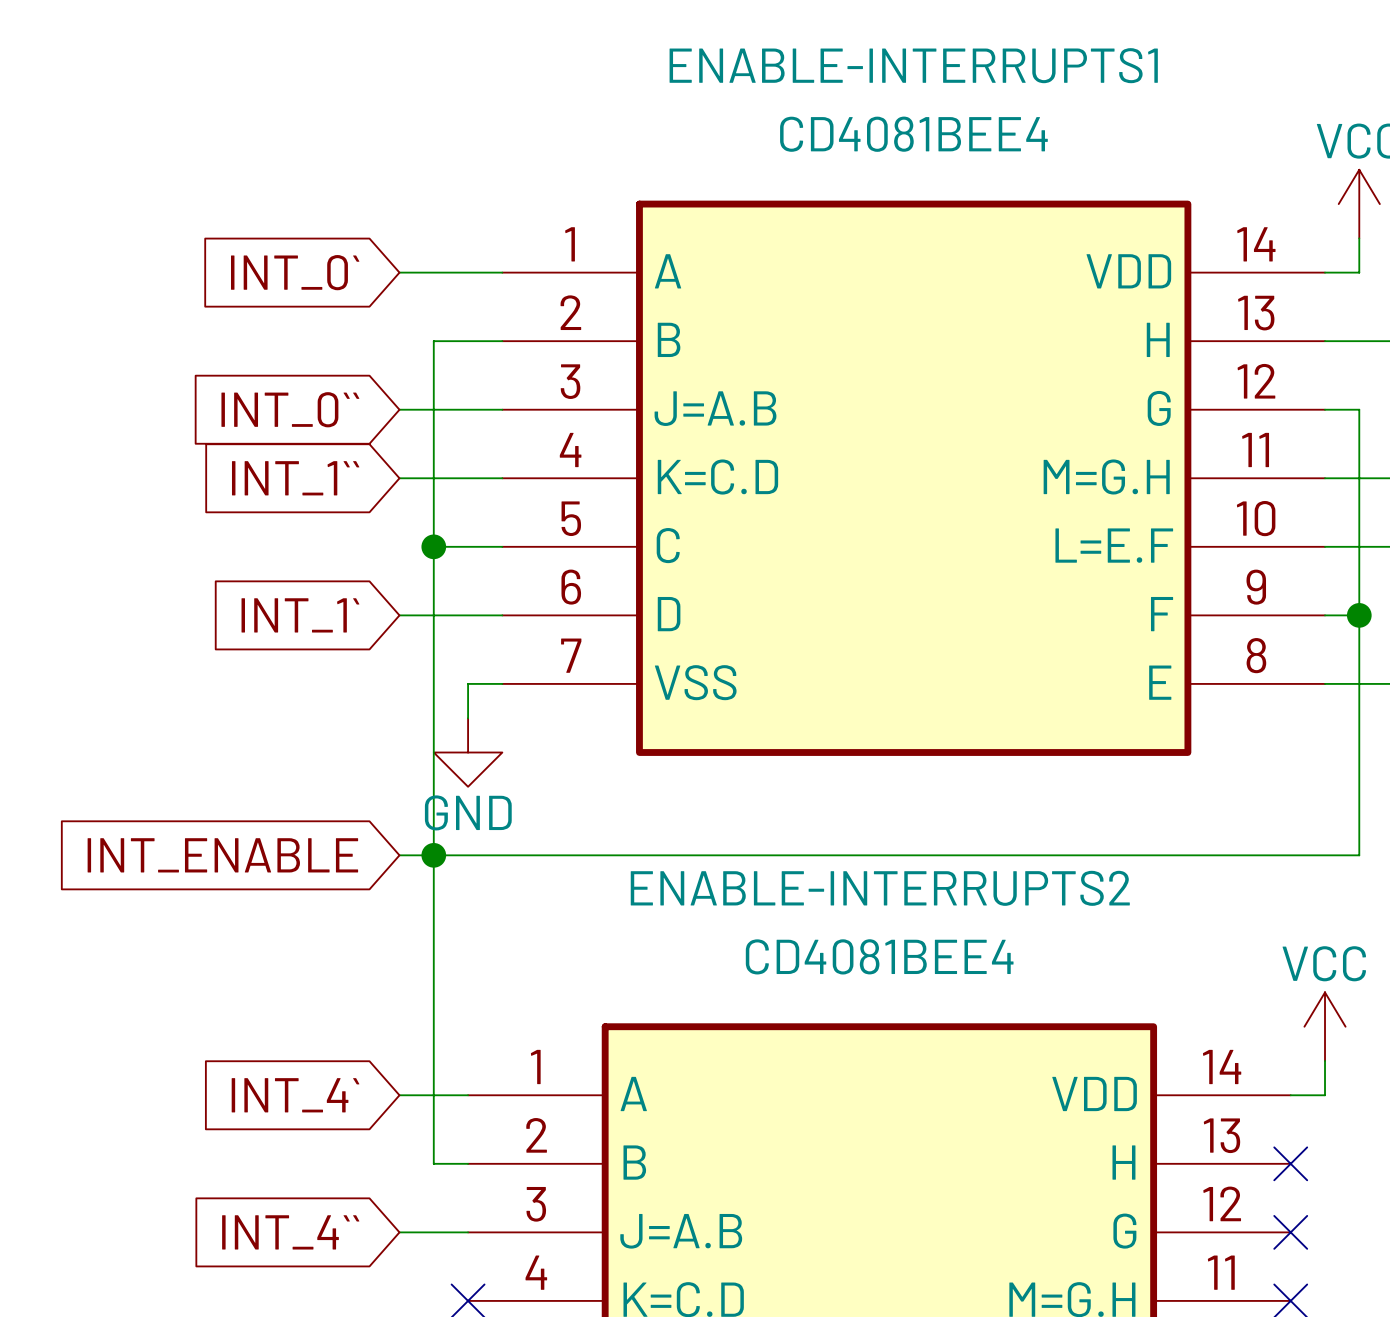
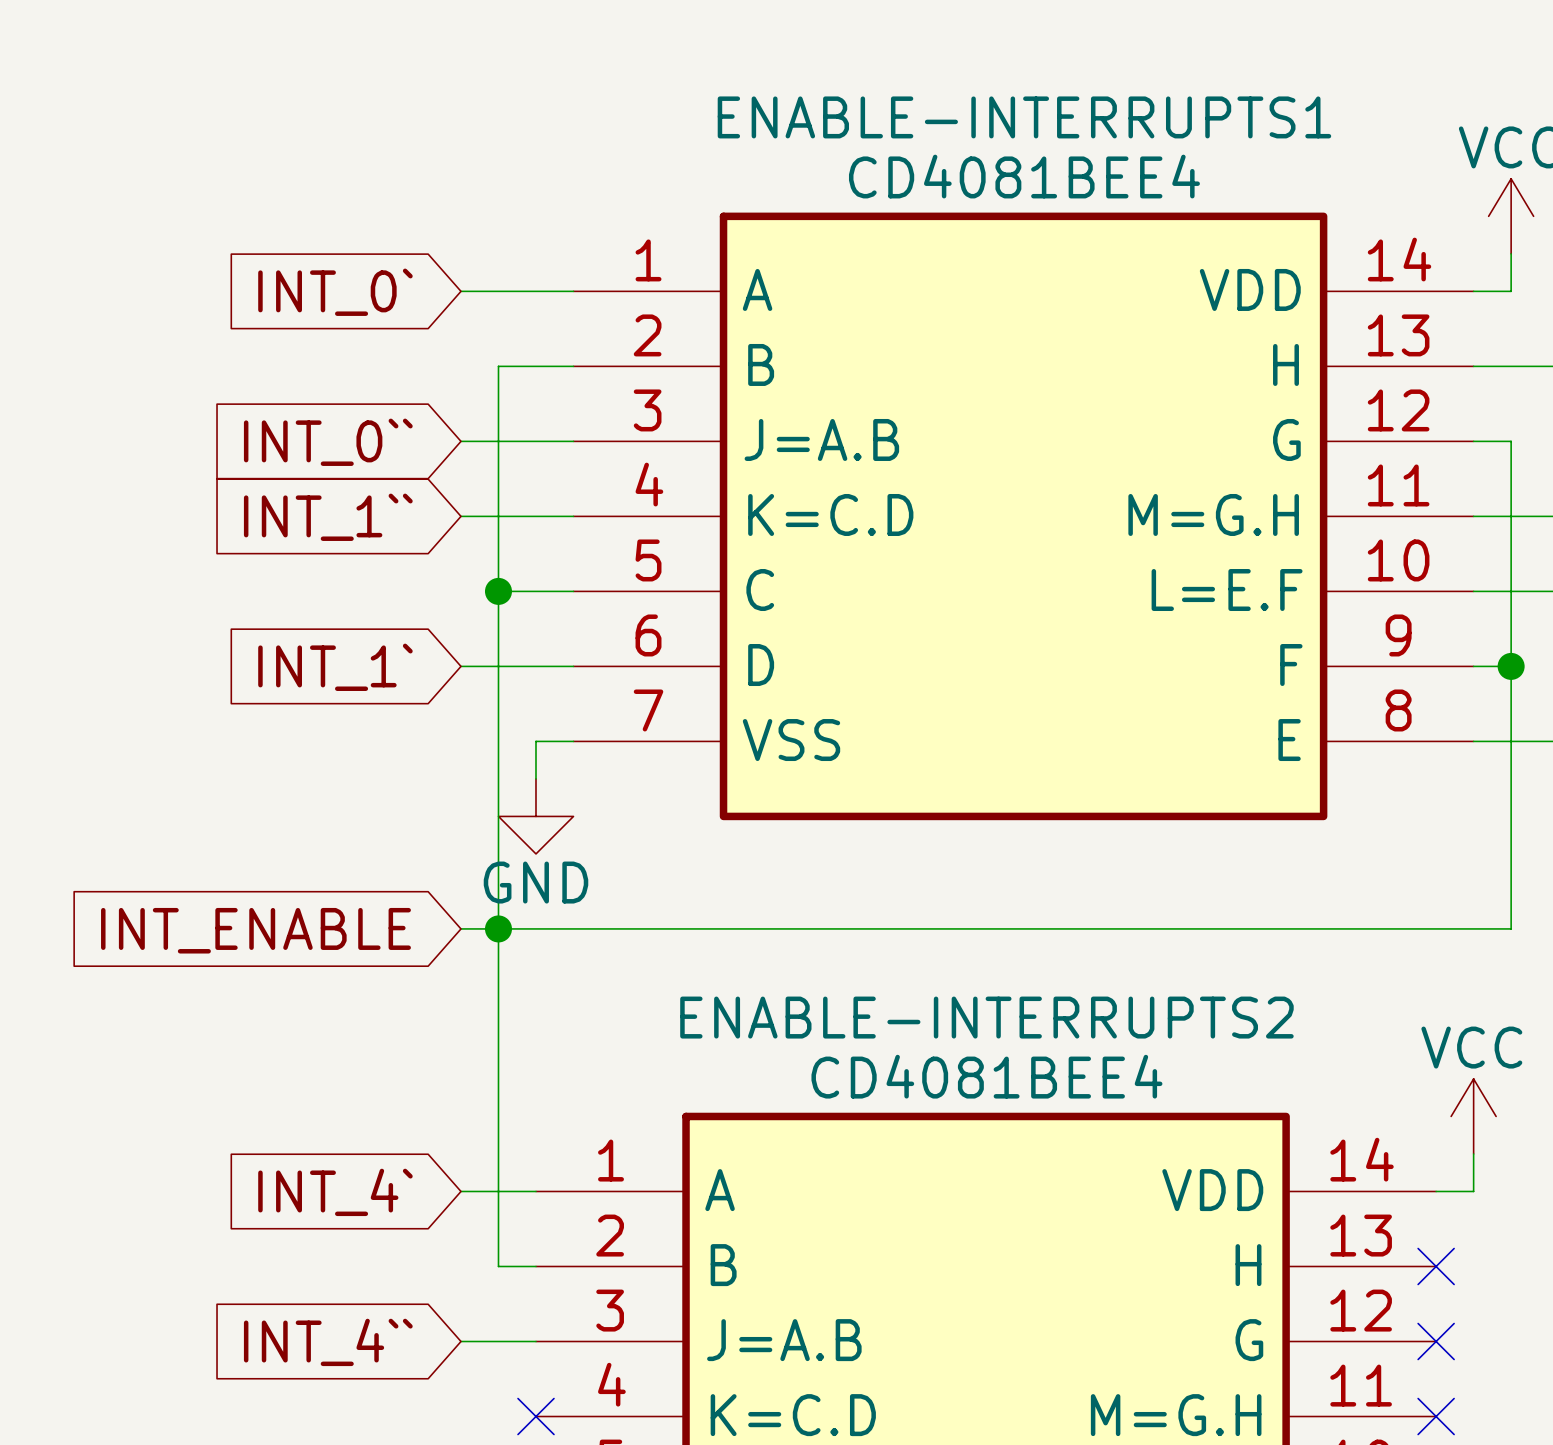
ENABLE-INTERRUPTS1 name position: ENABLE-INTERRUPTS1 (913, 65) -> ENABLE-INTERRUPTS1 (1024, 117)
ENABLE-INTERRUPTS1 value position: CD4081BEE4 (913, 134) -> CD4081BEE4 (1024, 176)
ENABLE-INTERRUPTS2 name position: ENABLE-INTERRUPTS2 (880, 888) -> ENABLE-INTERRUPTS2 (986, 1017)
ENABLE-INTERRUPTS2 value position: CD4081BEE4 (879, 956) -> CD4081BEE4 (986, 1076)

